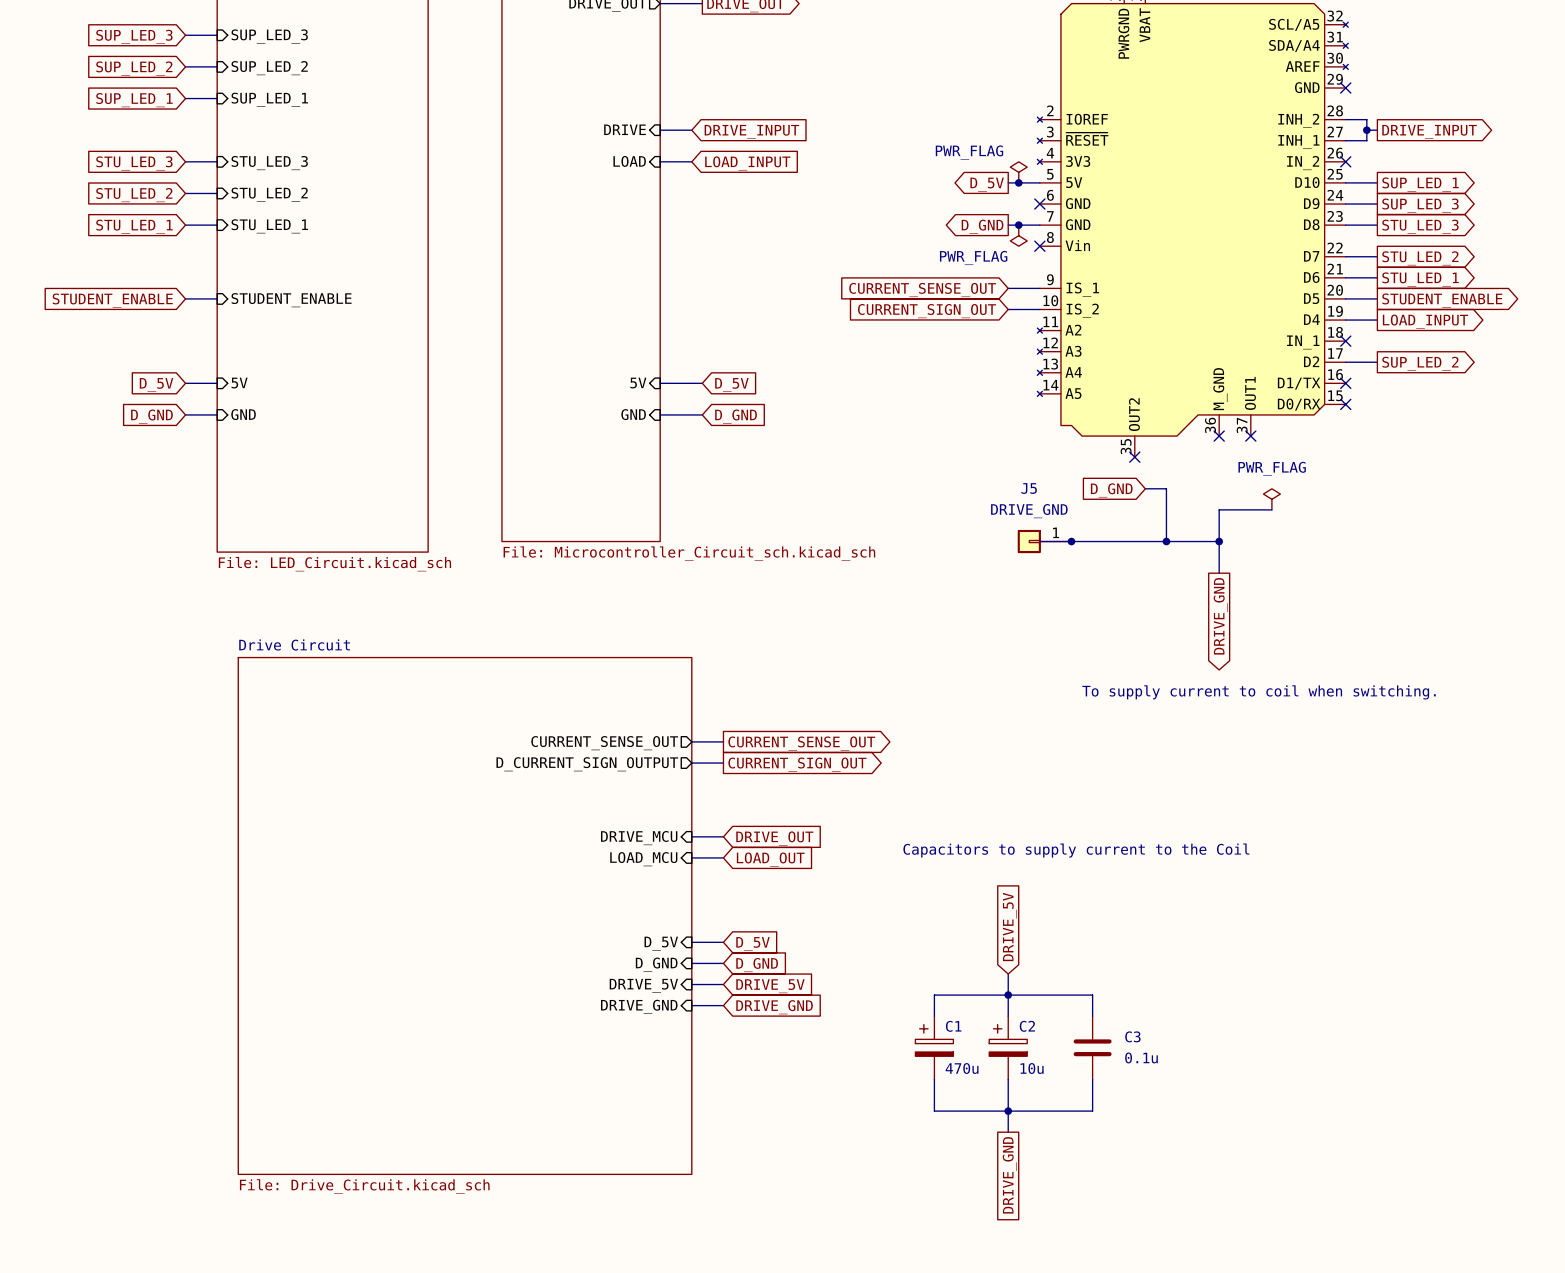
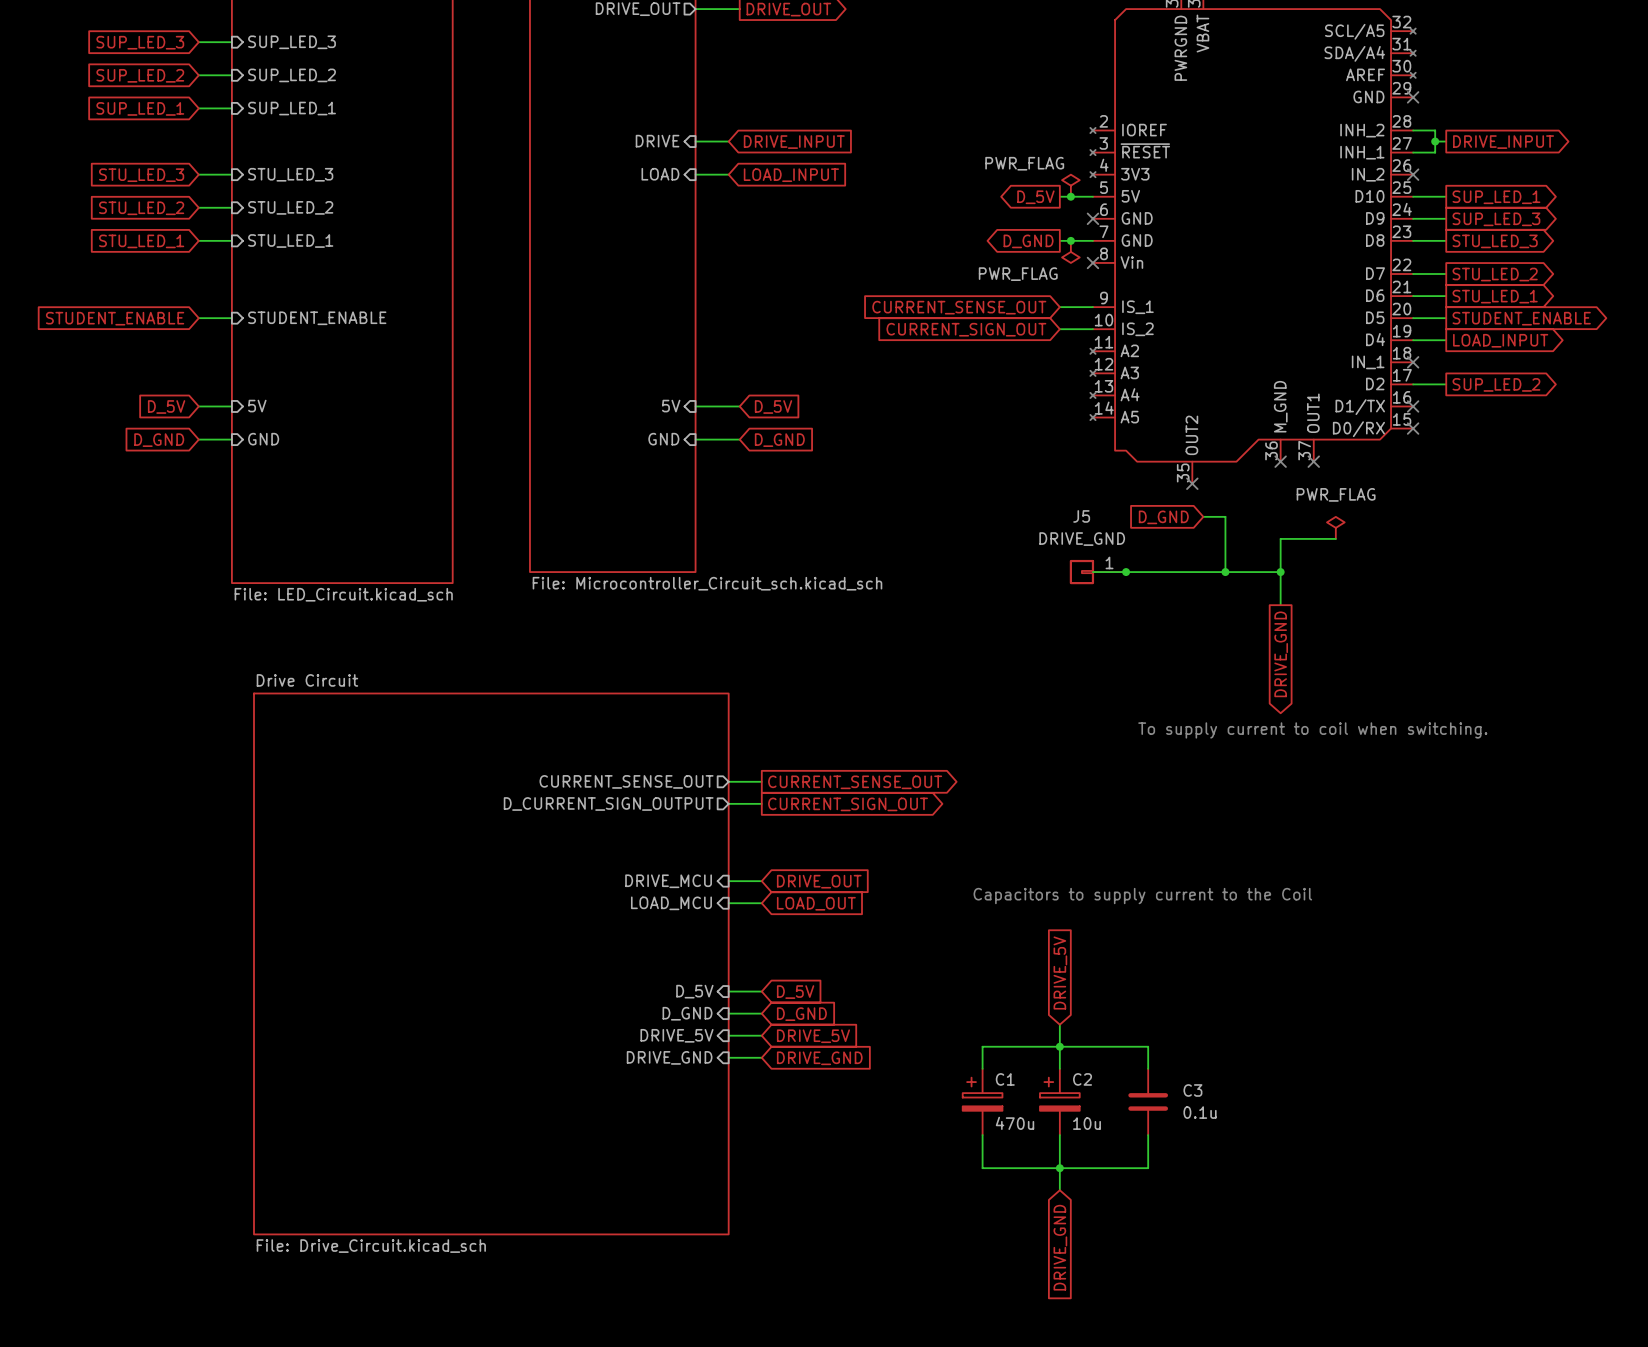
global label shape: passive (1009, 1175) -> input (1060, 1247)

